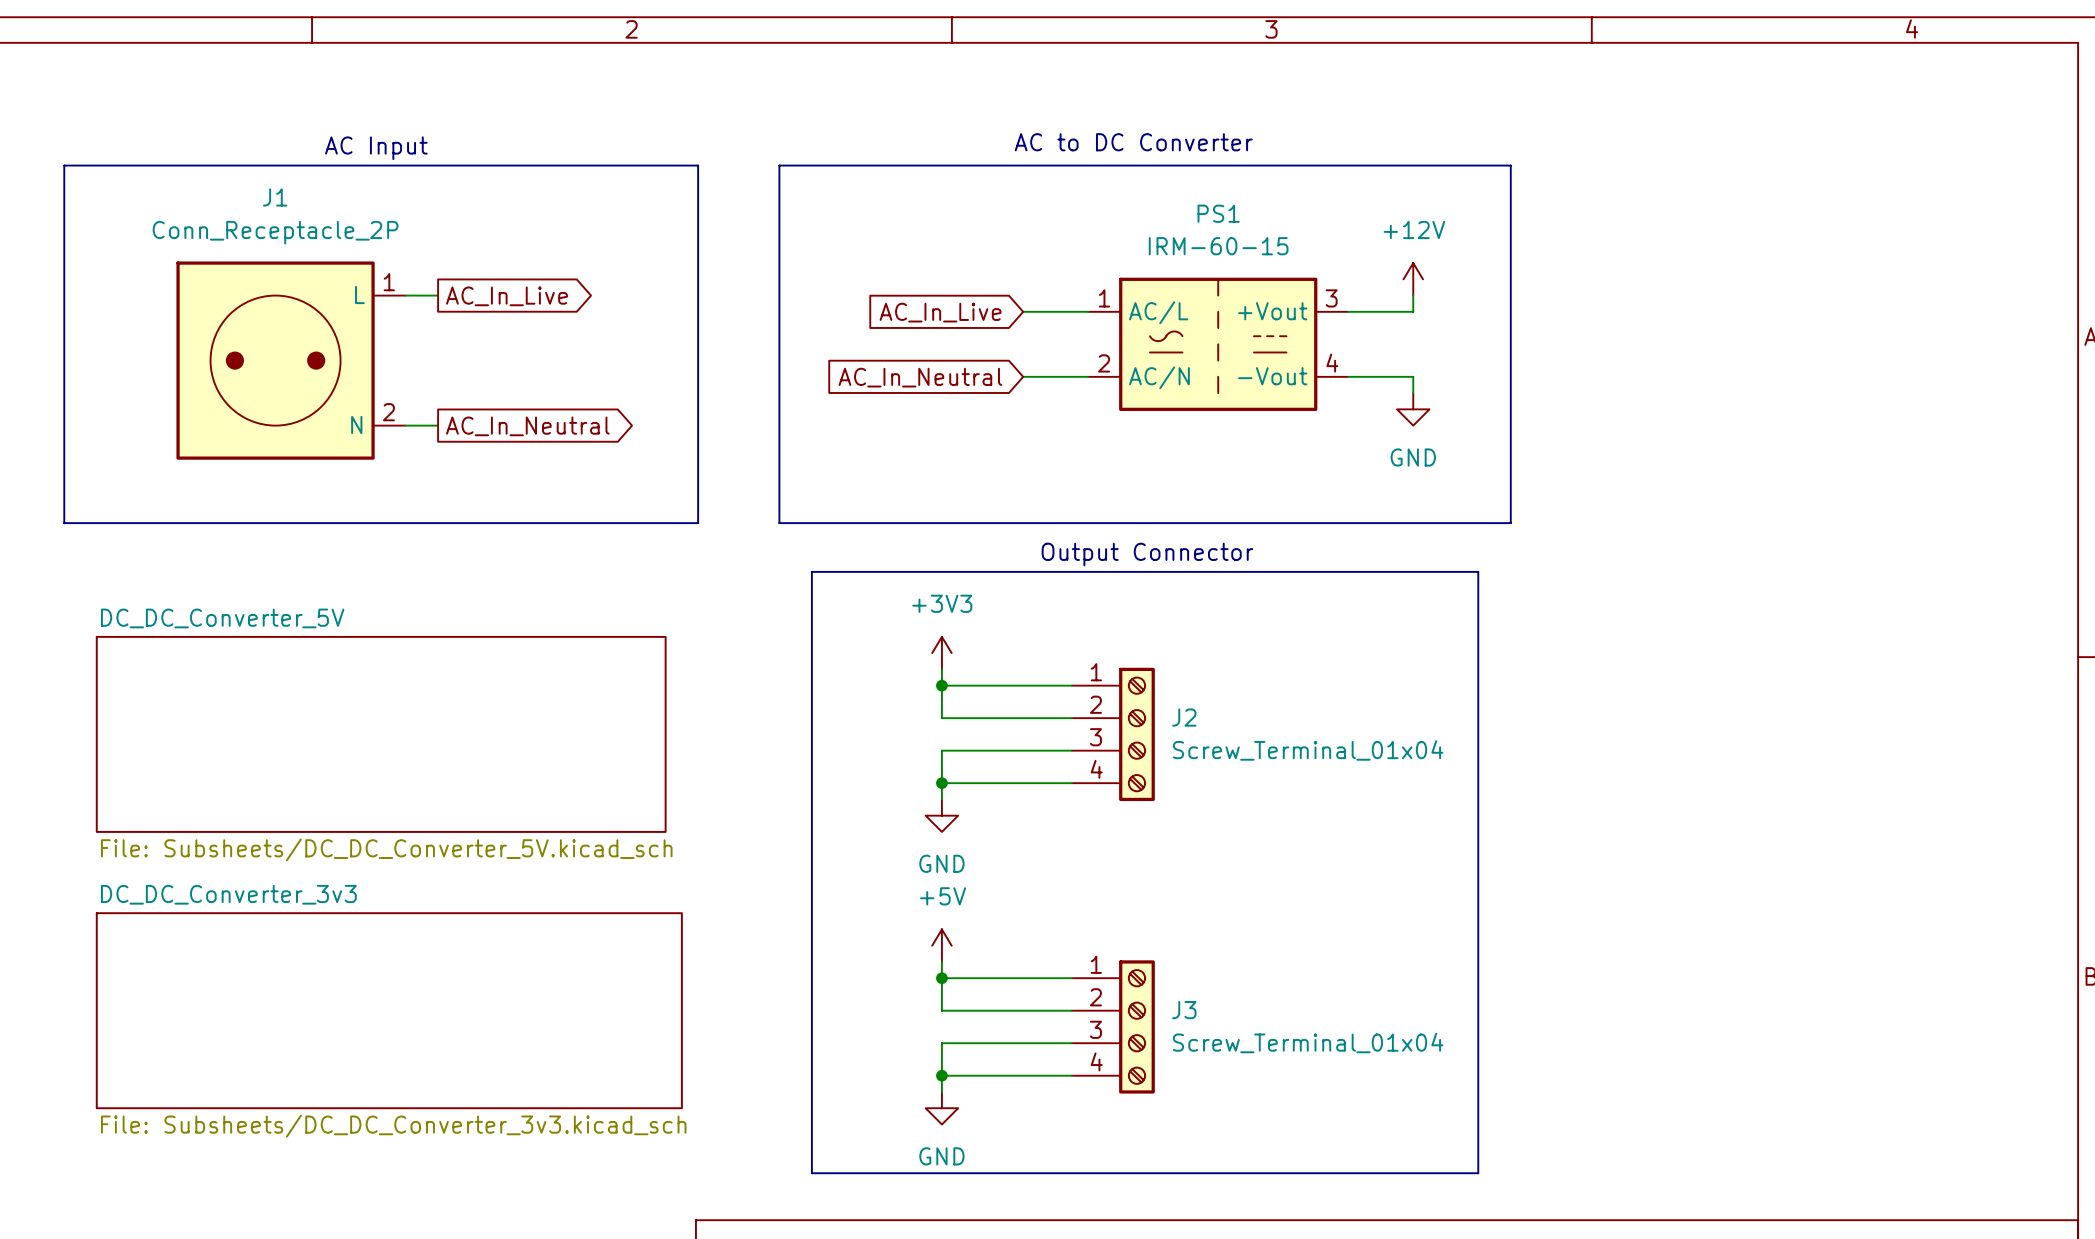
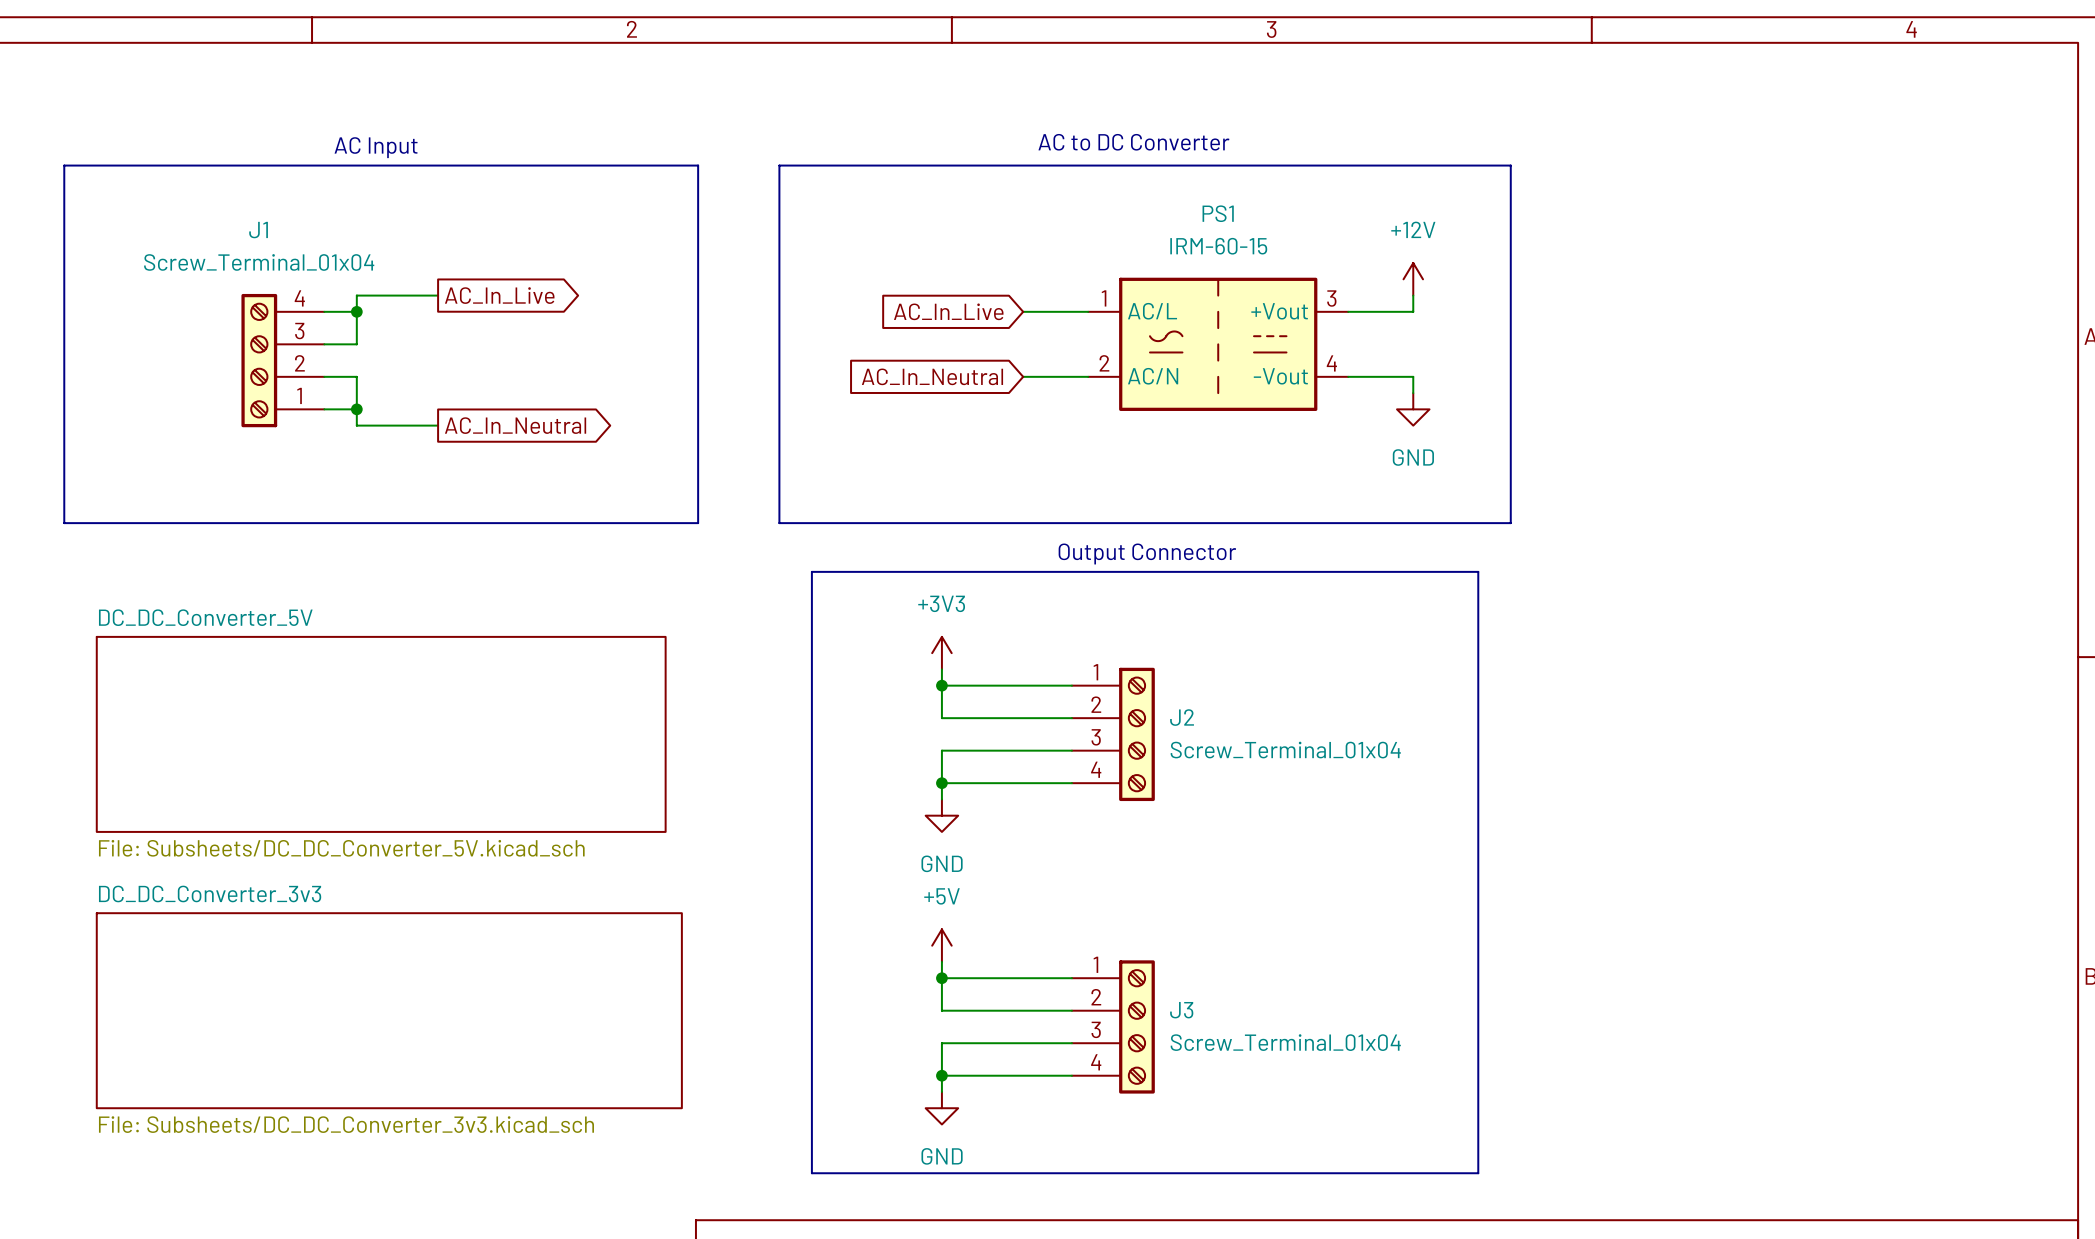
J1 name position: J1 (275, 197) -> J1 (258, 230)
J1 value: Conn_Receptacle_2P (275, 232) -> Screw_Terminal_01x04 (259, 262)
J1 symbol: [176, 261, 406, 460] -> [241, 293, 325, 428]
junction: none -> (356, 311)
junction: none -> (356, 409)

